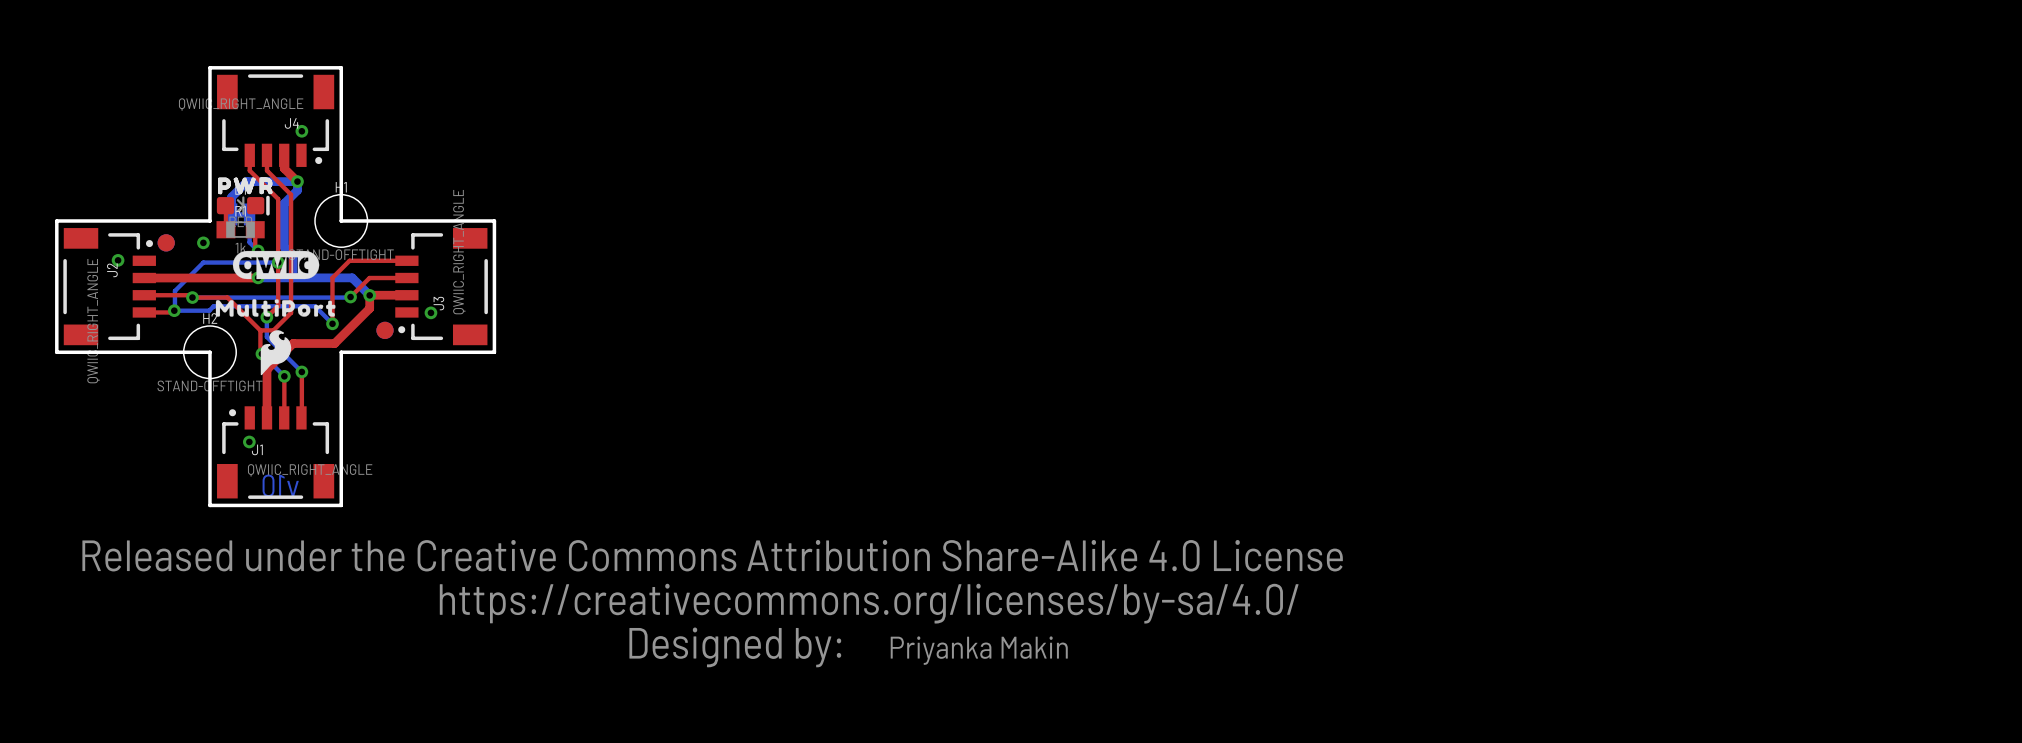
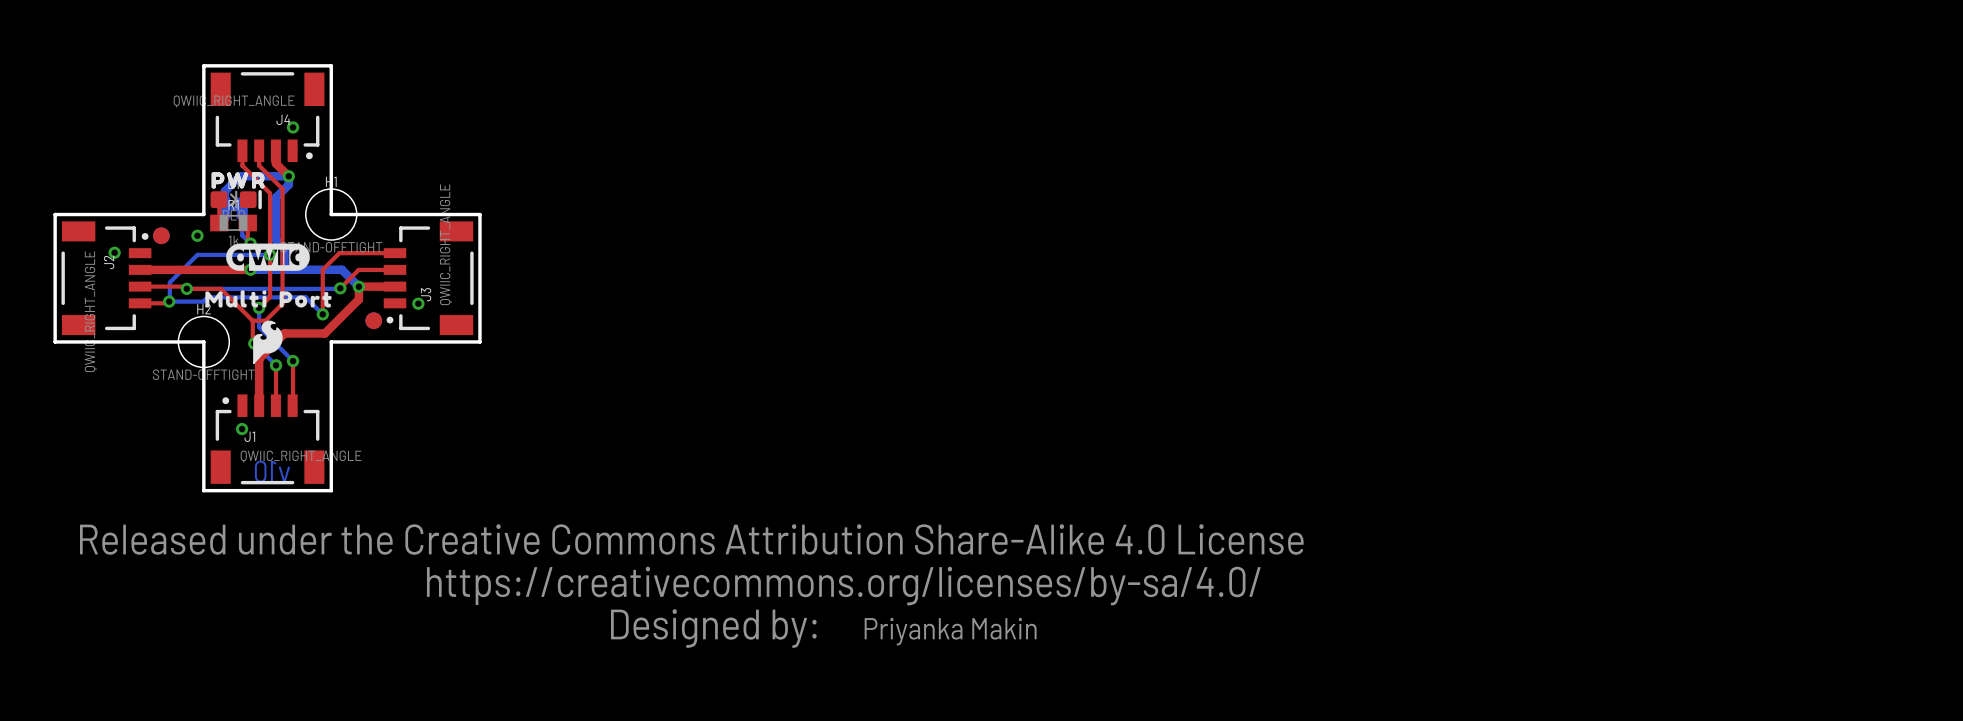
drawing: none -> [205, 290, 332, 308]
drawing: [215, 299, 336, 317] -> none

